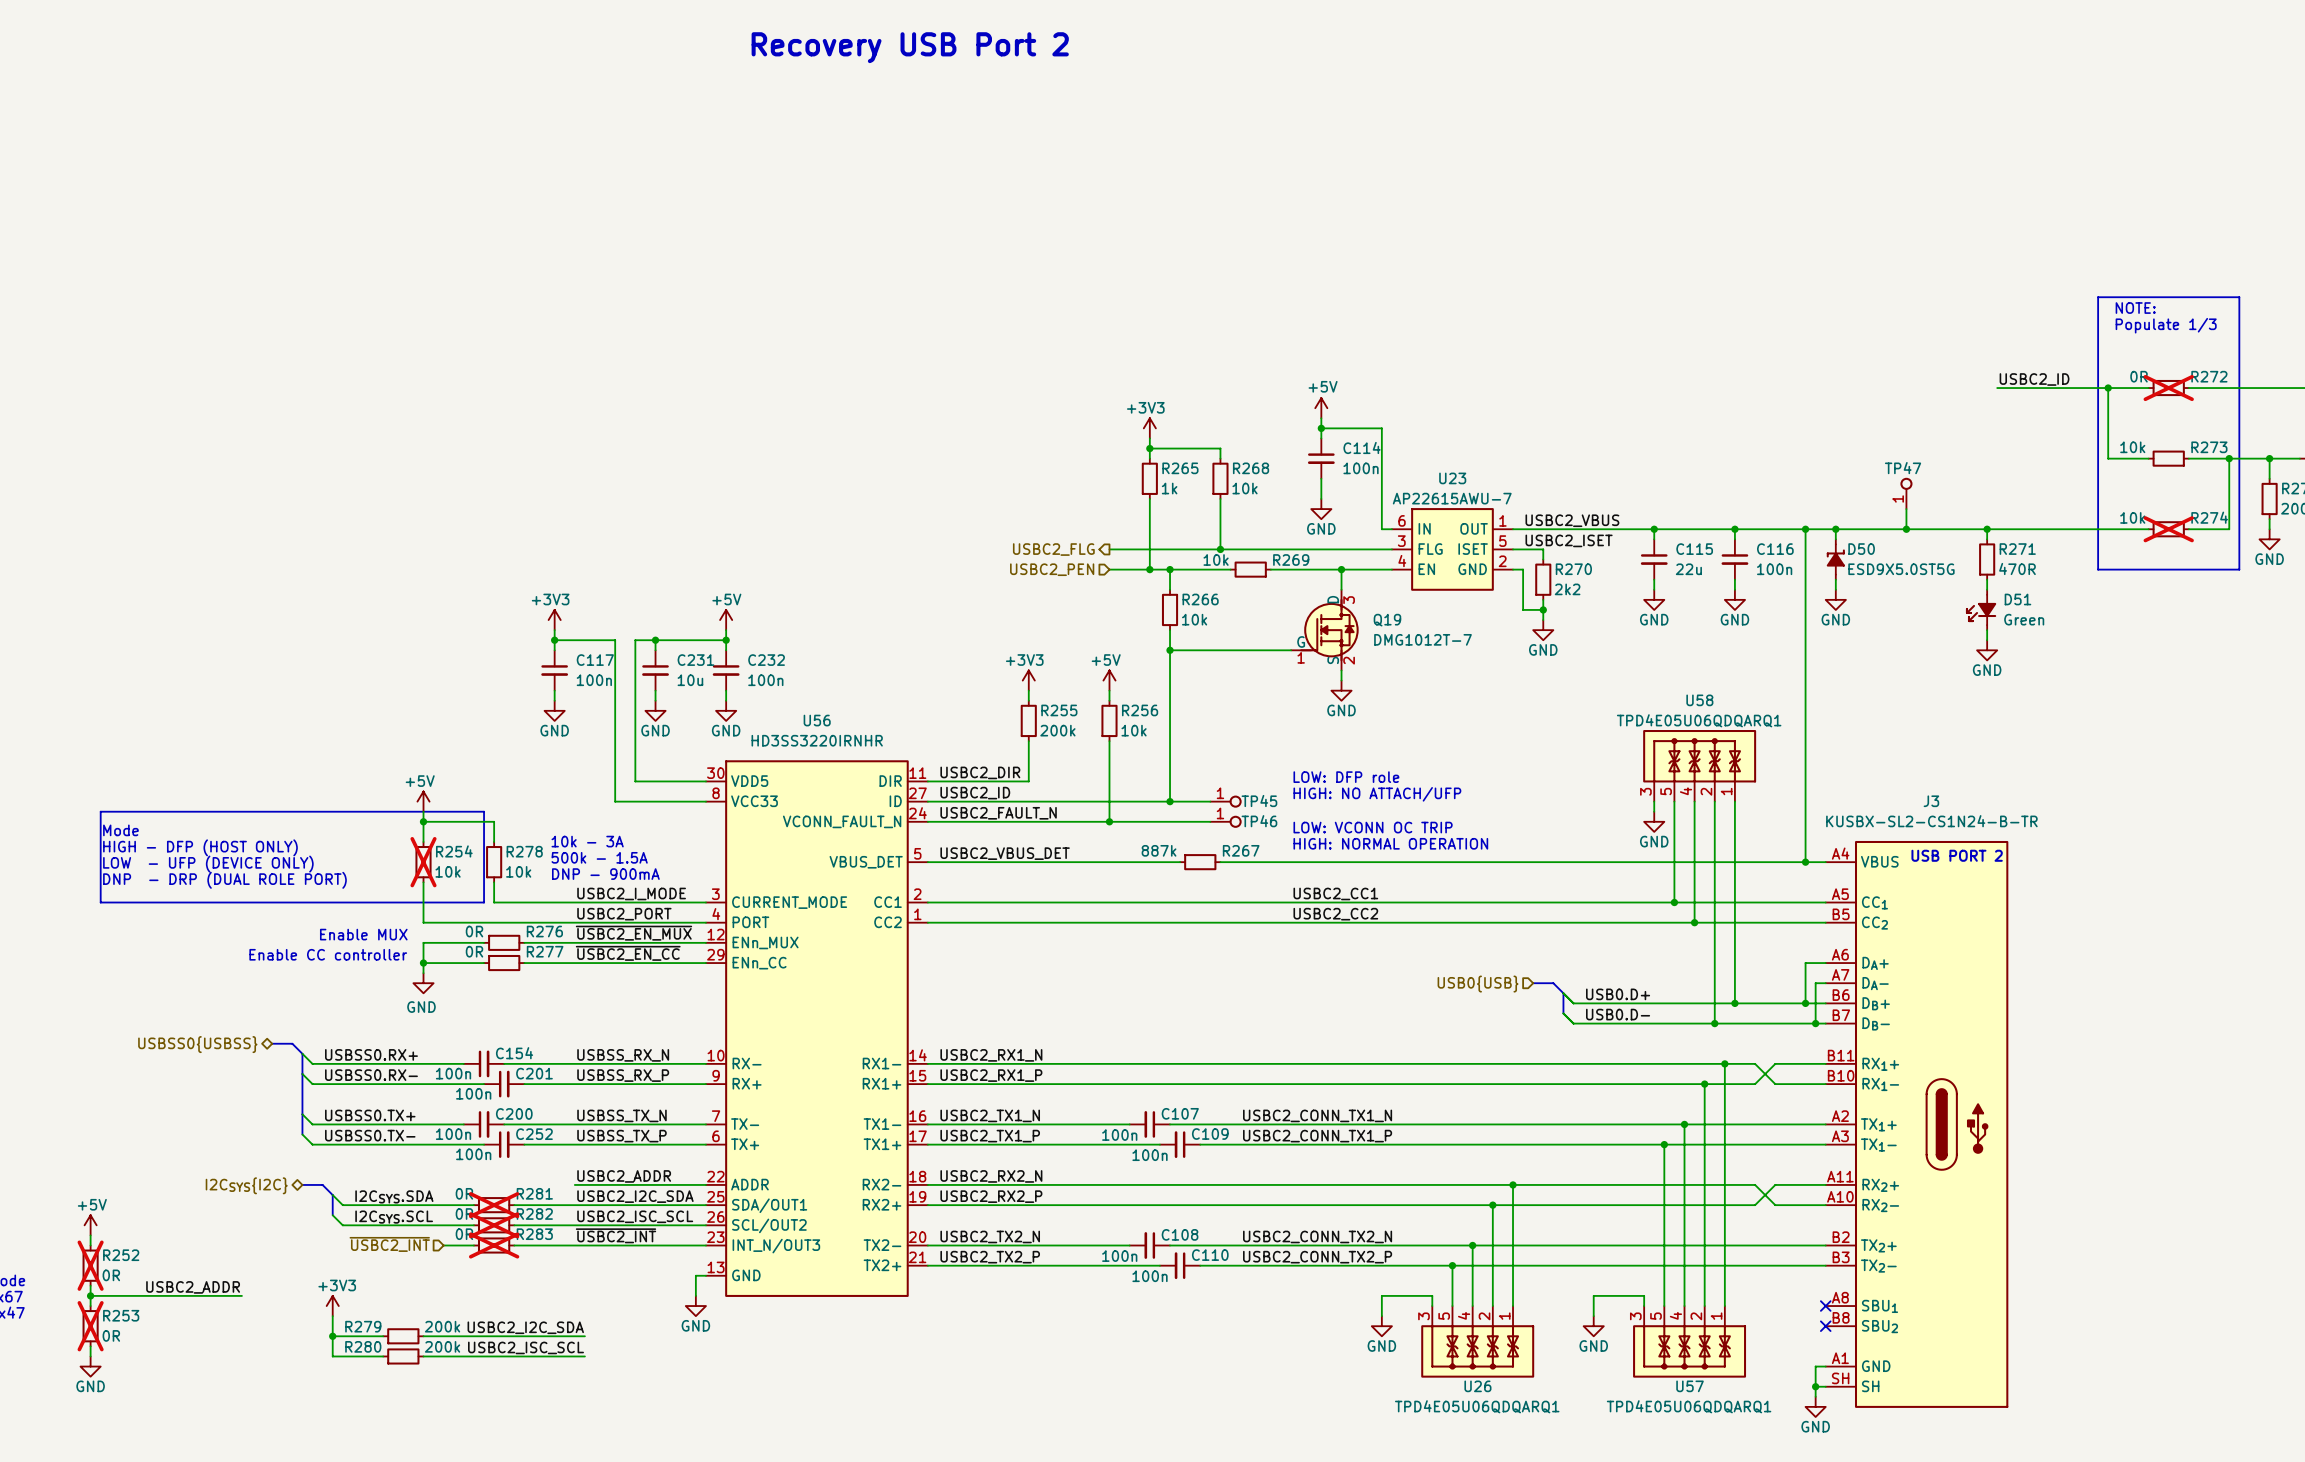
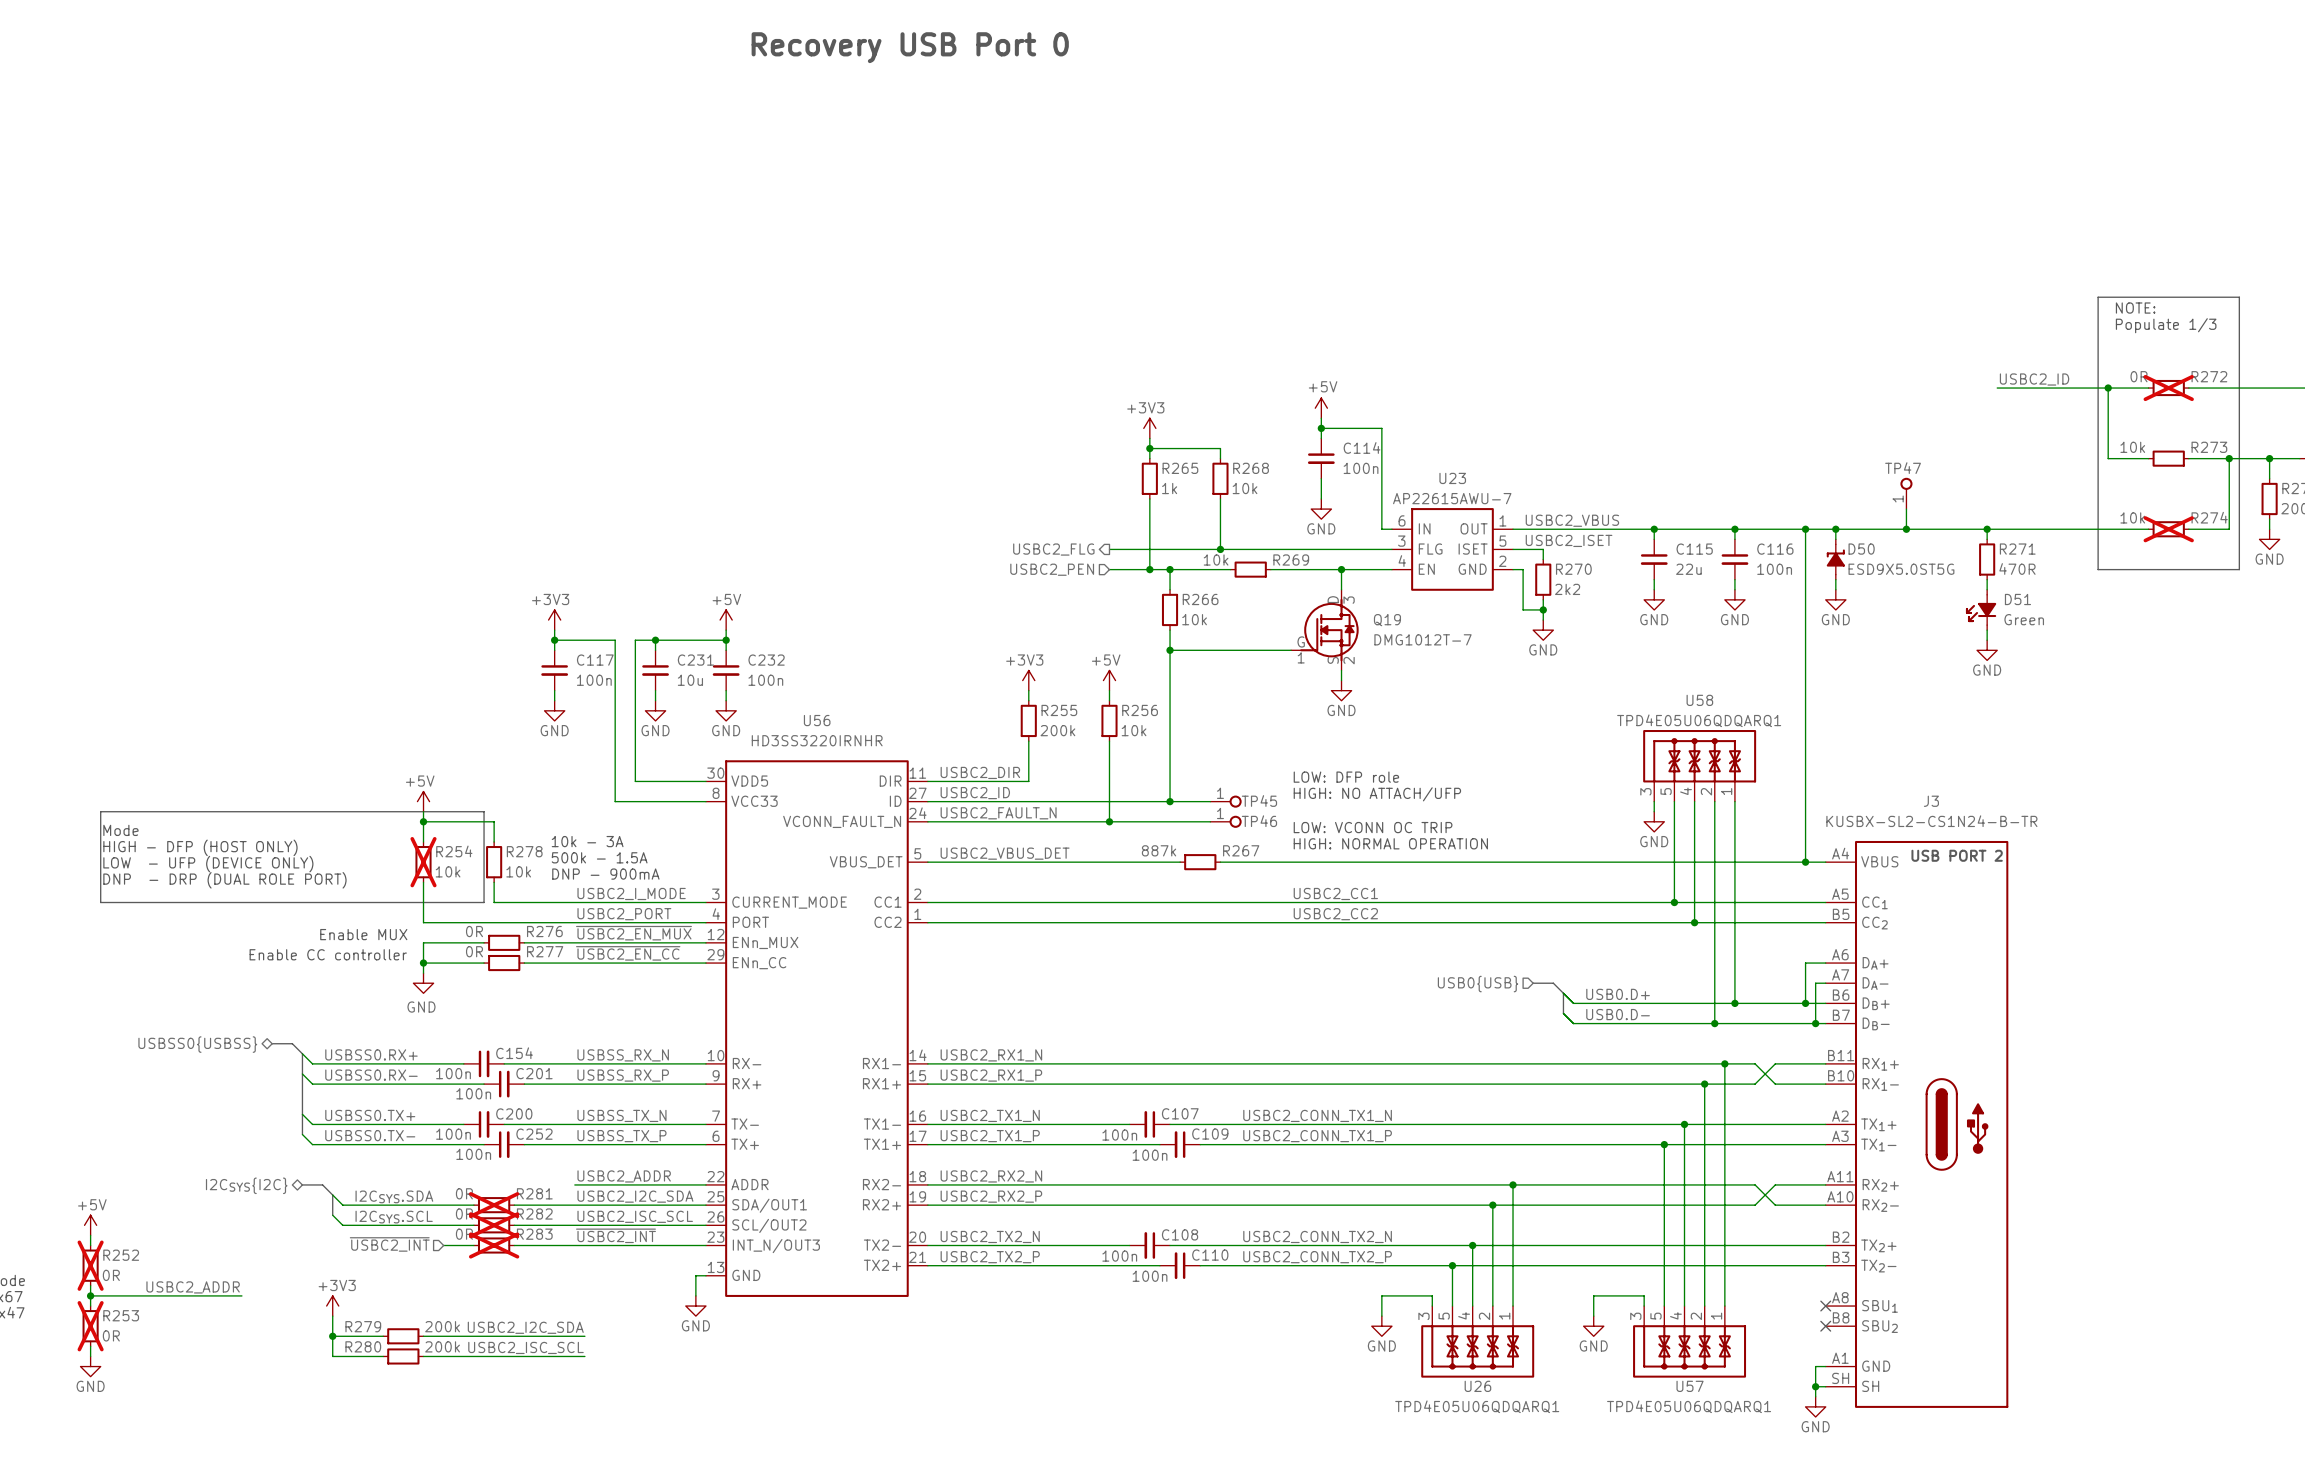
text: Recovery USB Port 2 (910, 47) -> Recovery USB Port 0 (910, 47)

